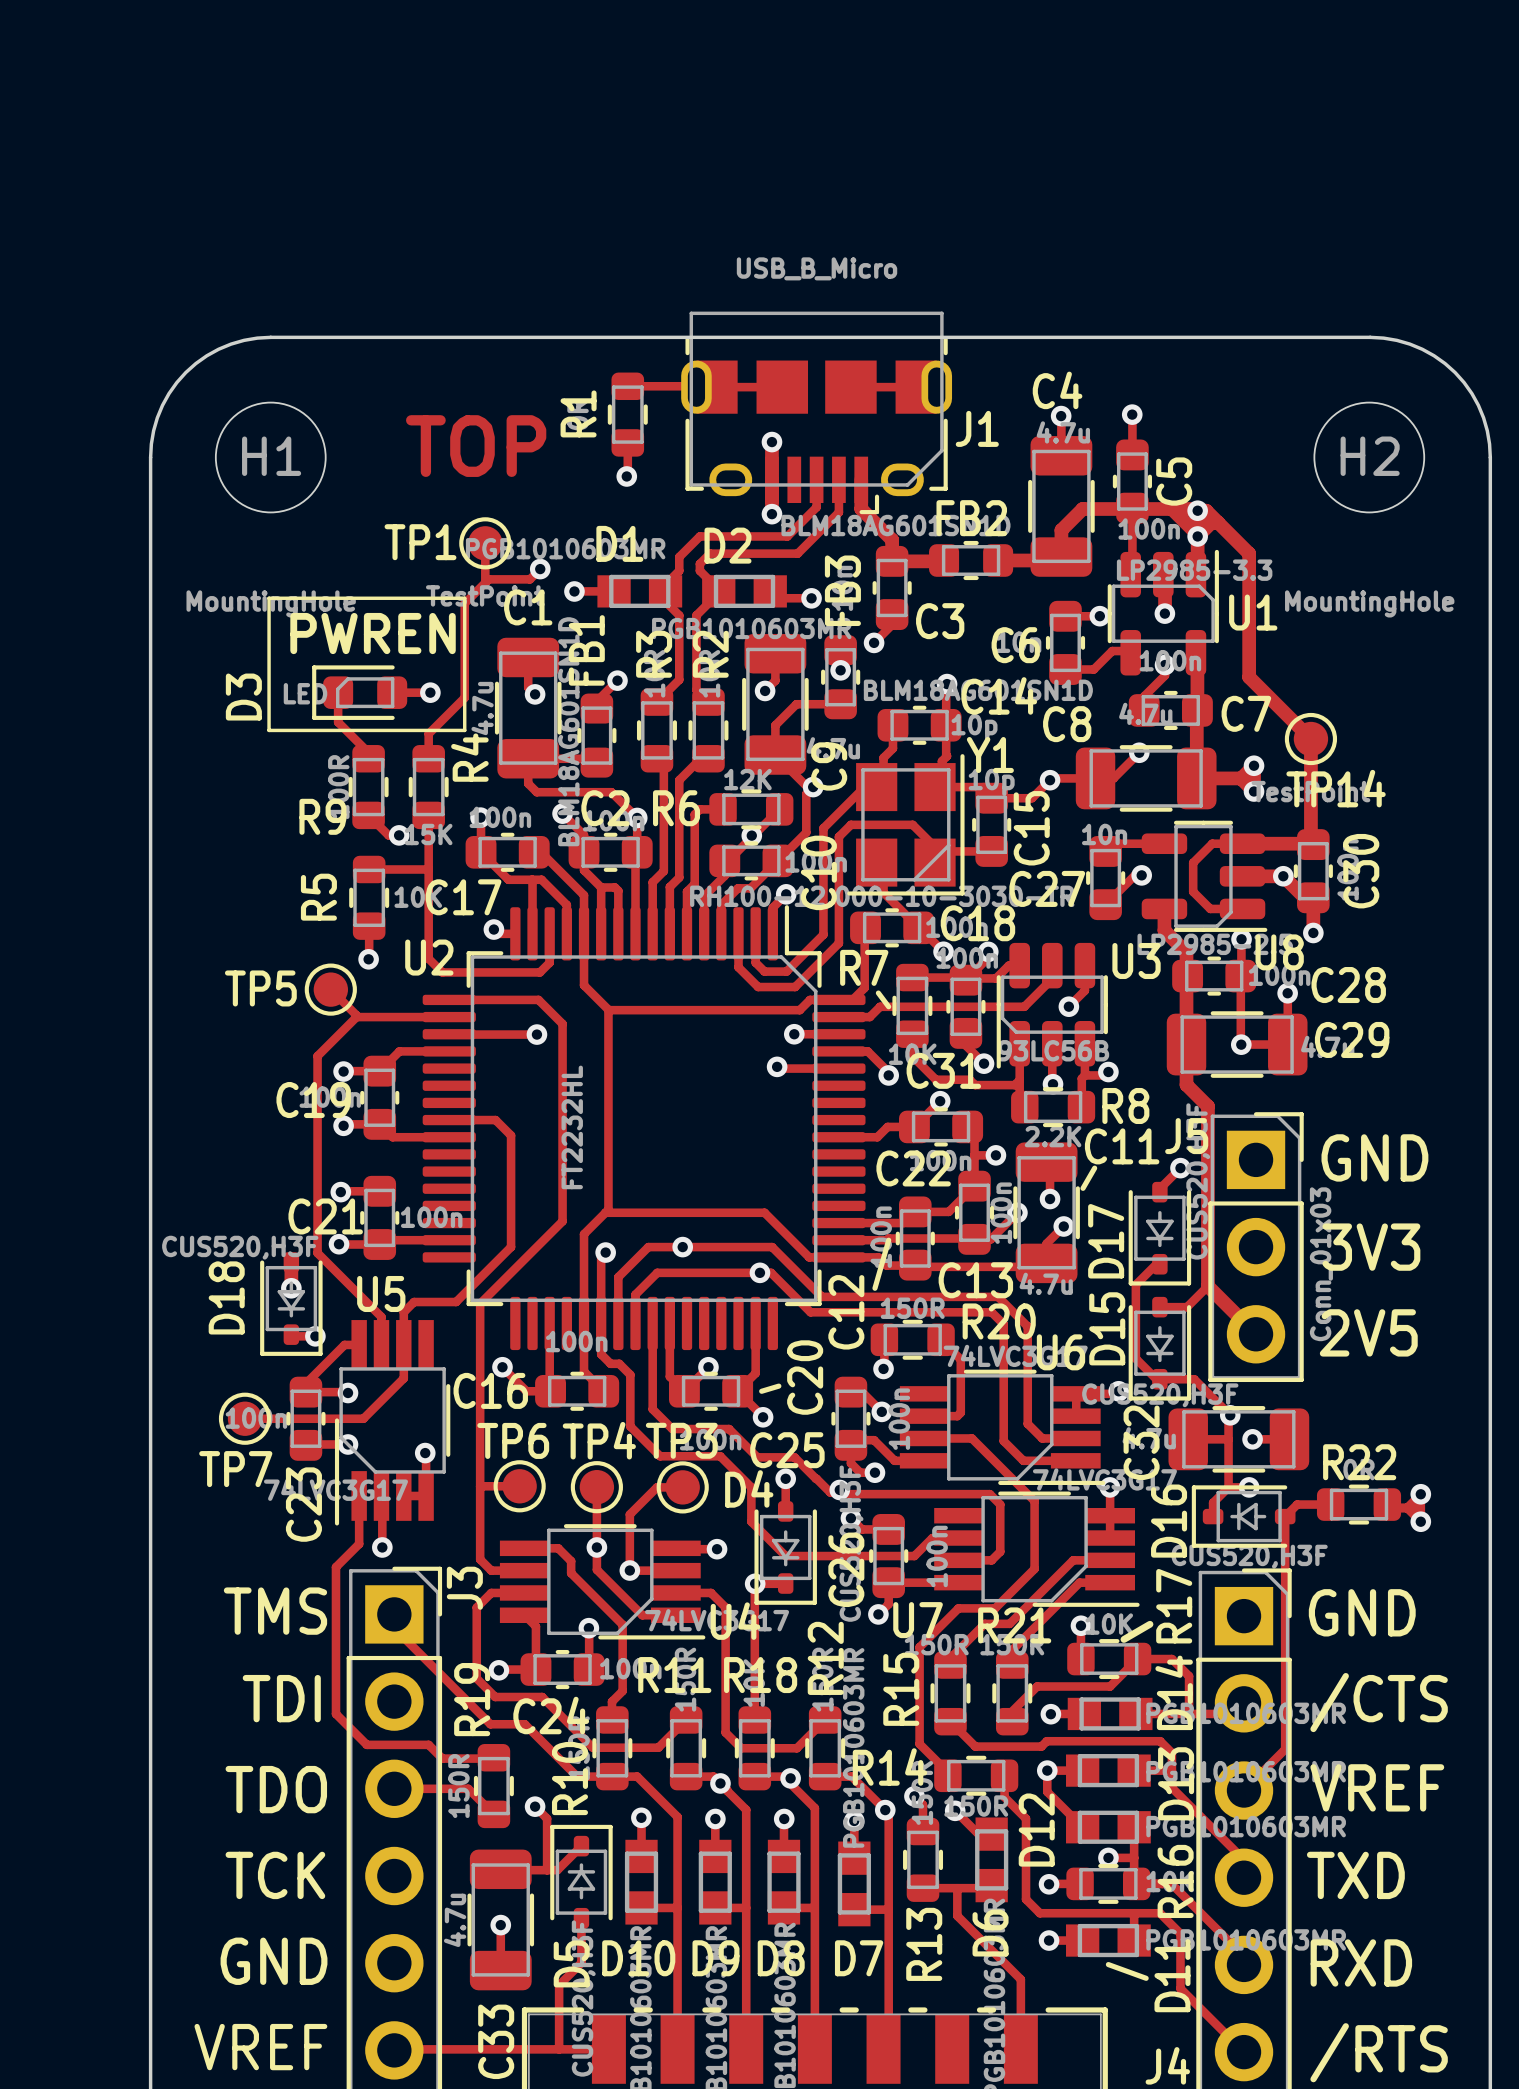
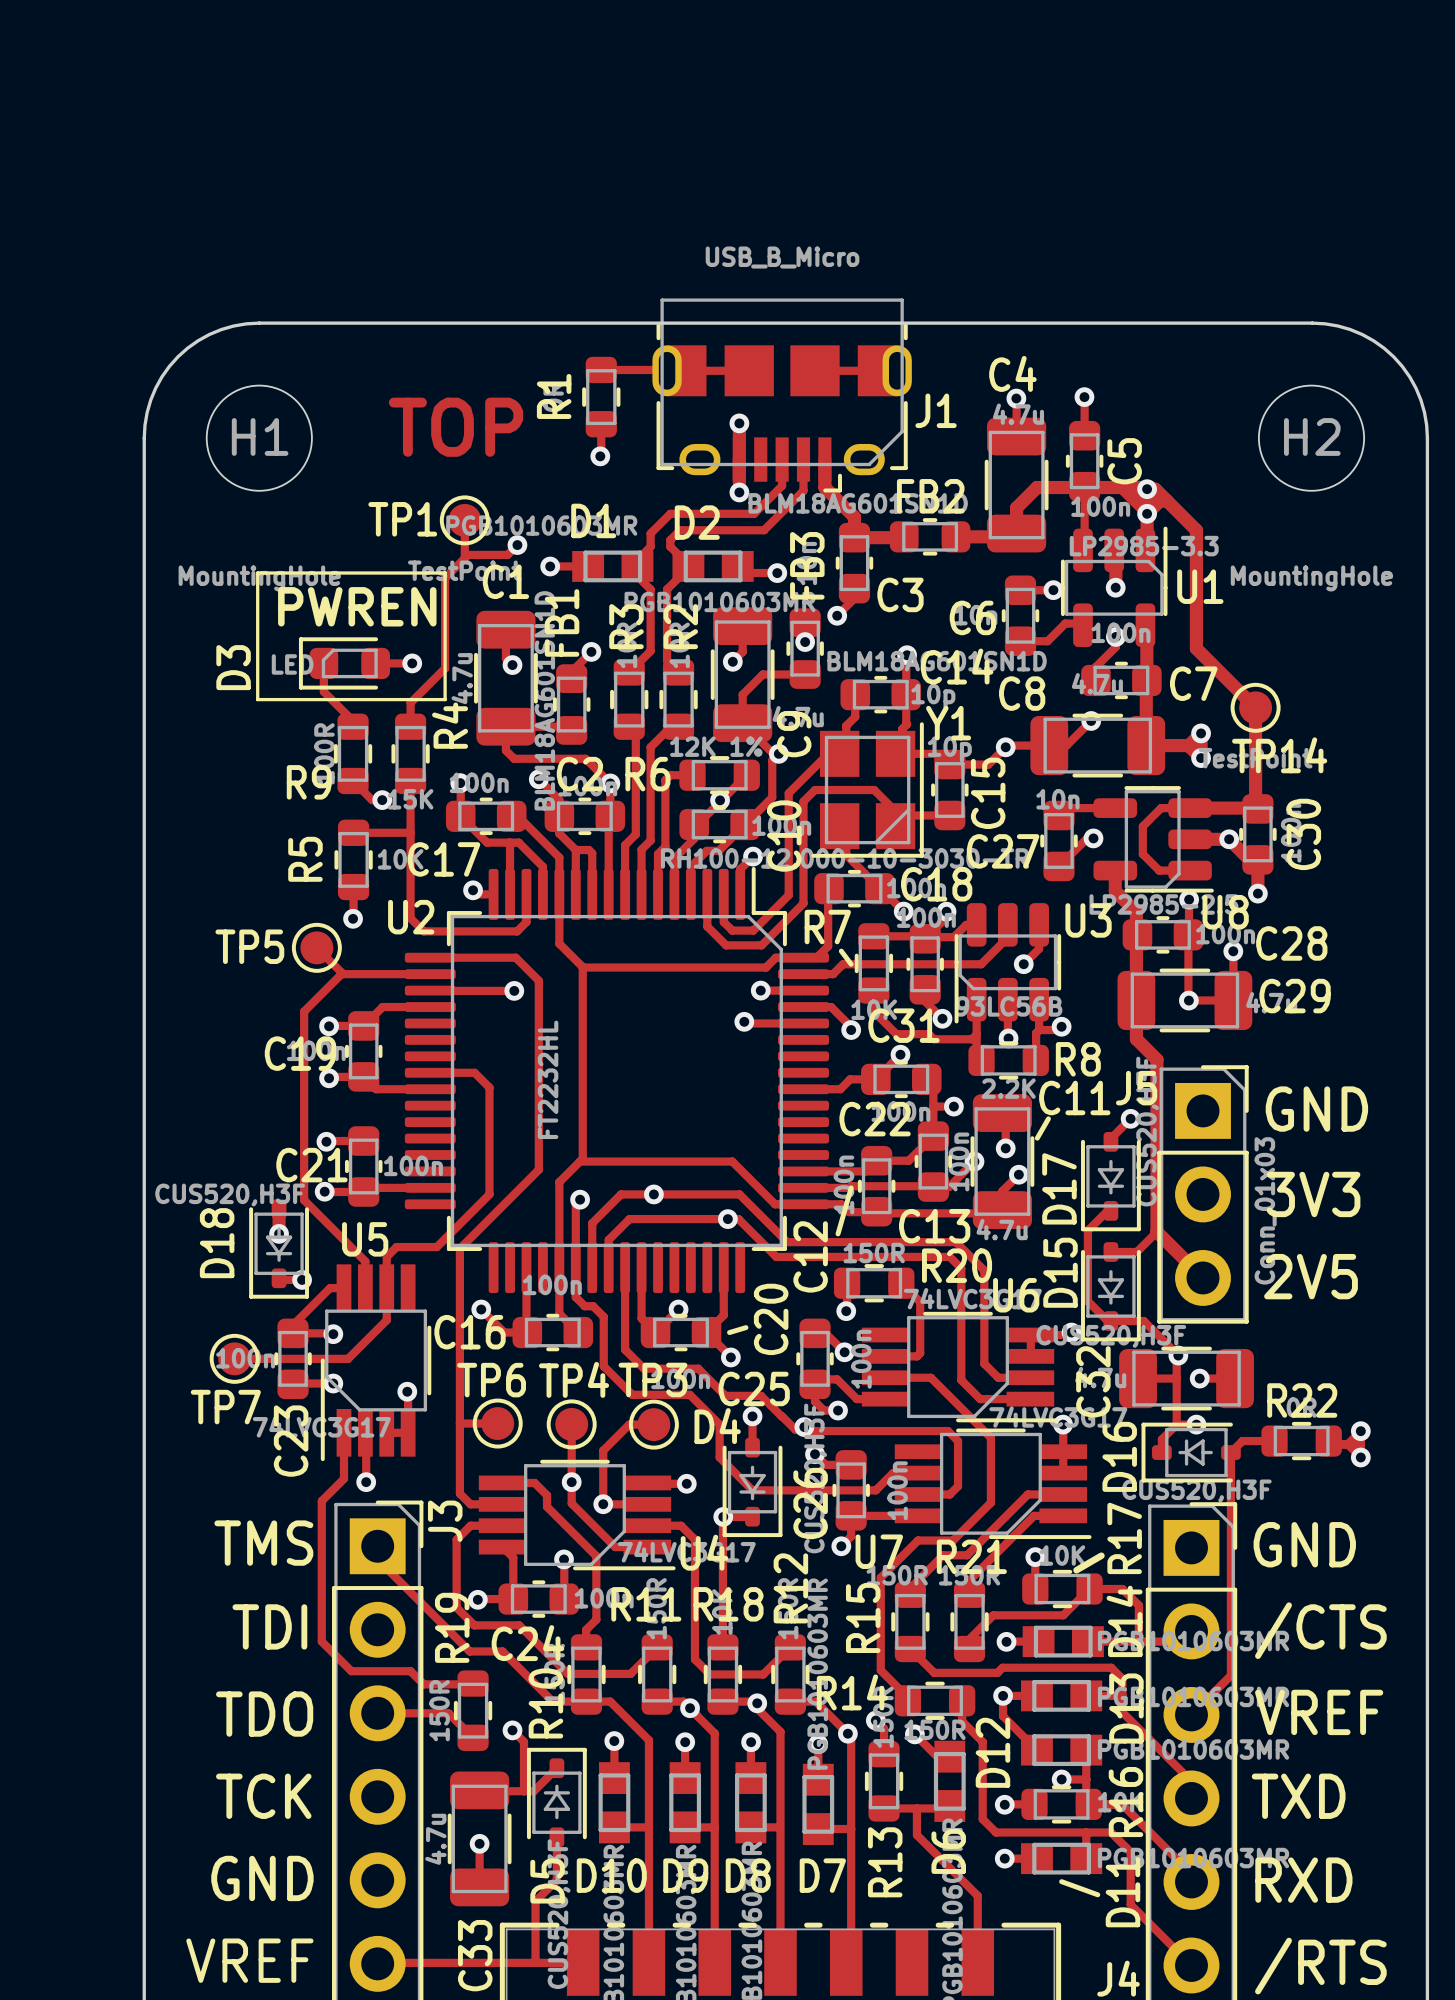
R6 value: 12K (747, 779) -> 12K 1% (716, 746)

